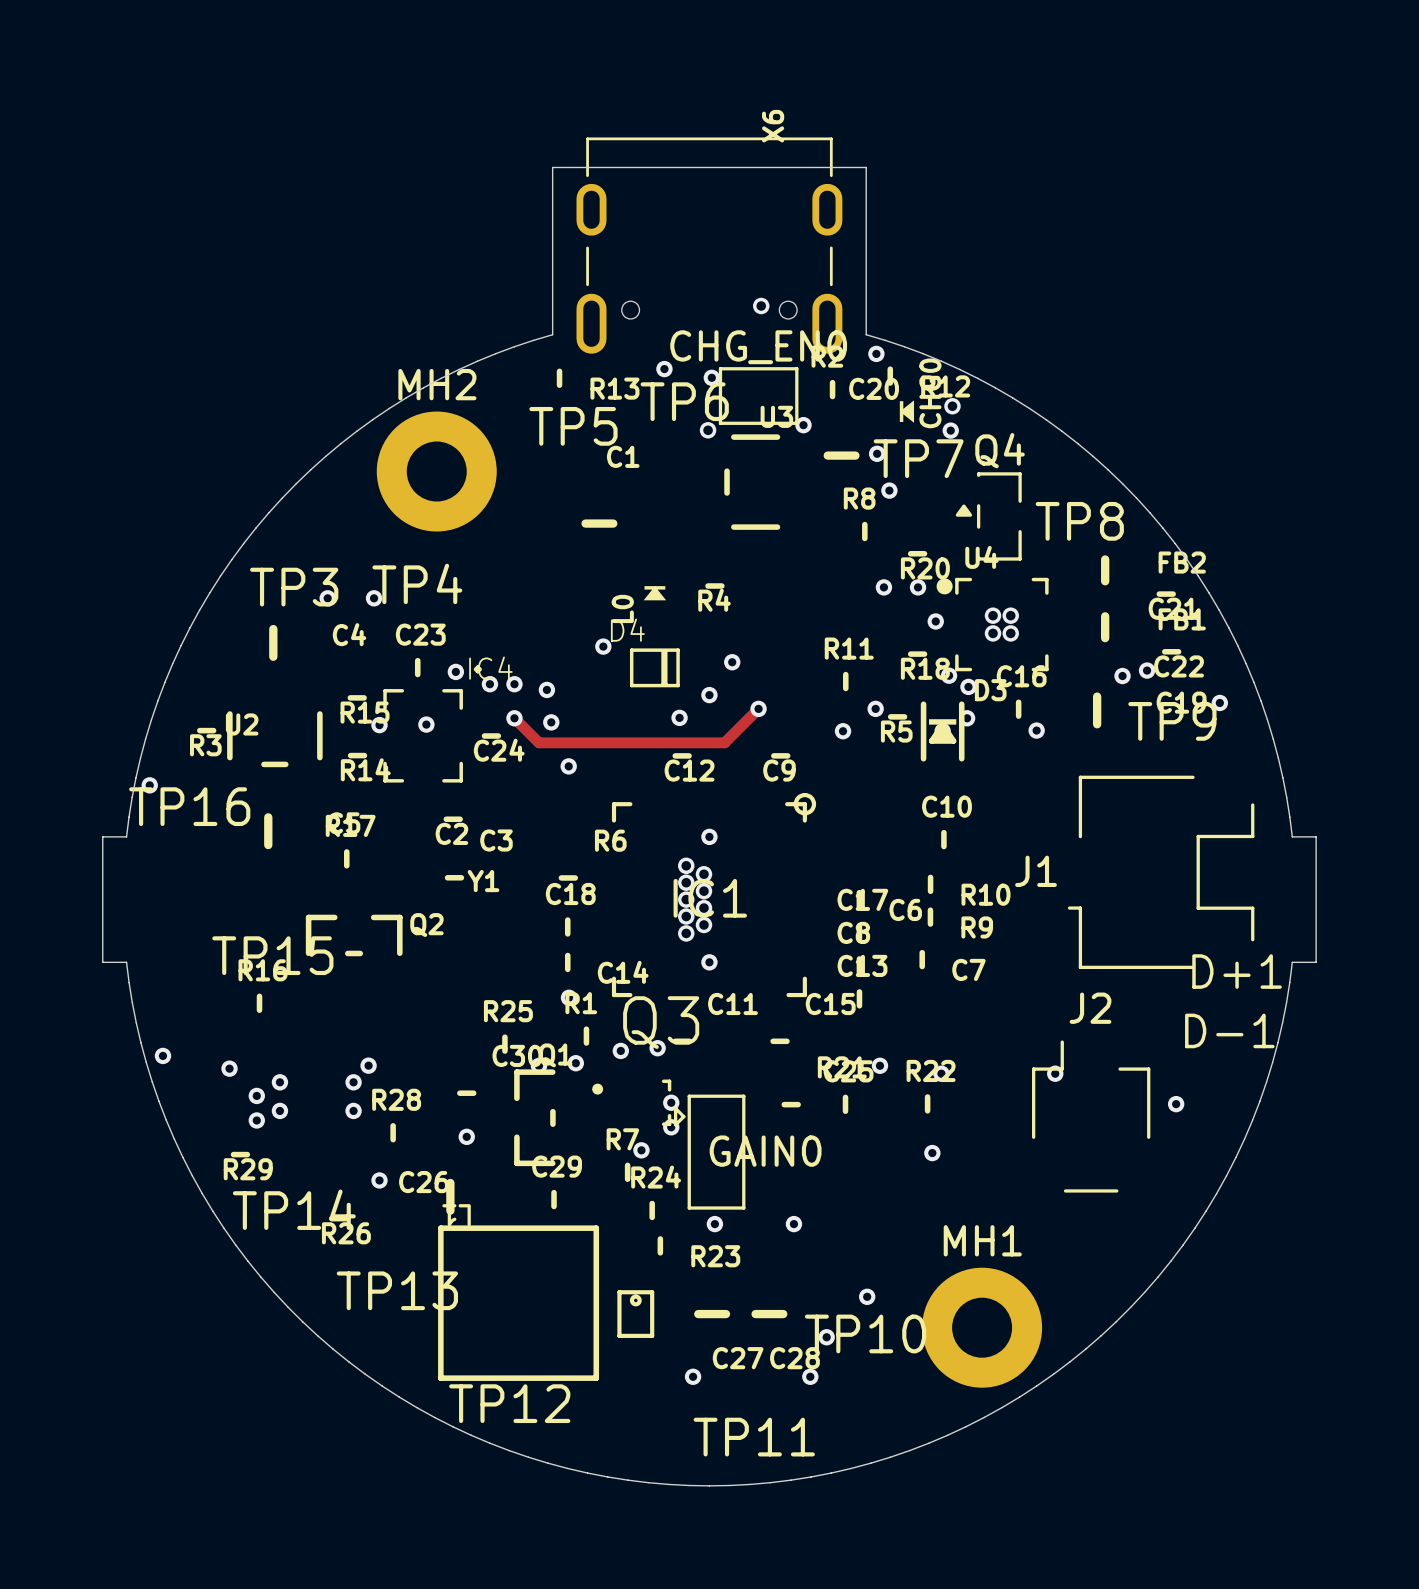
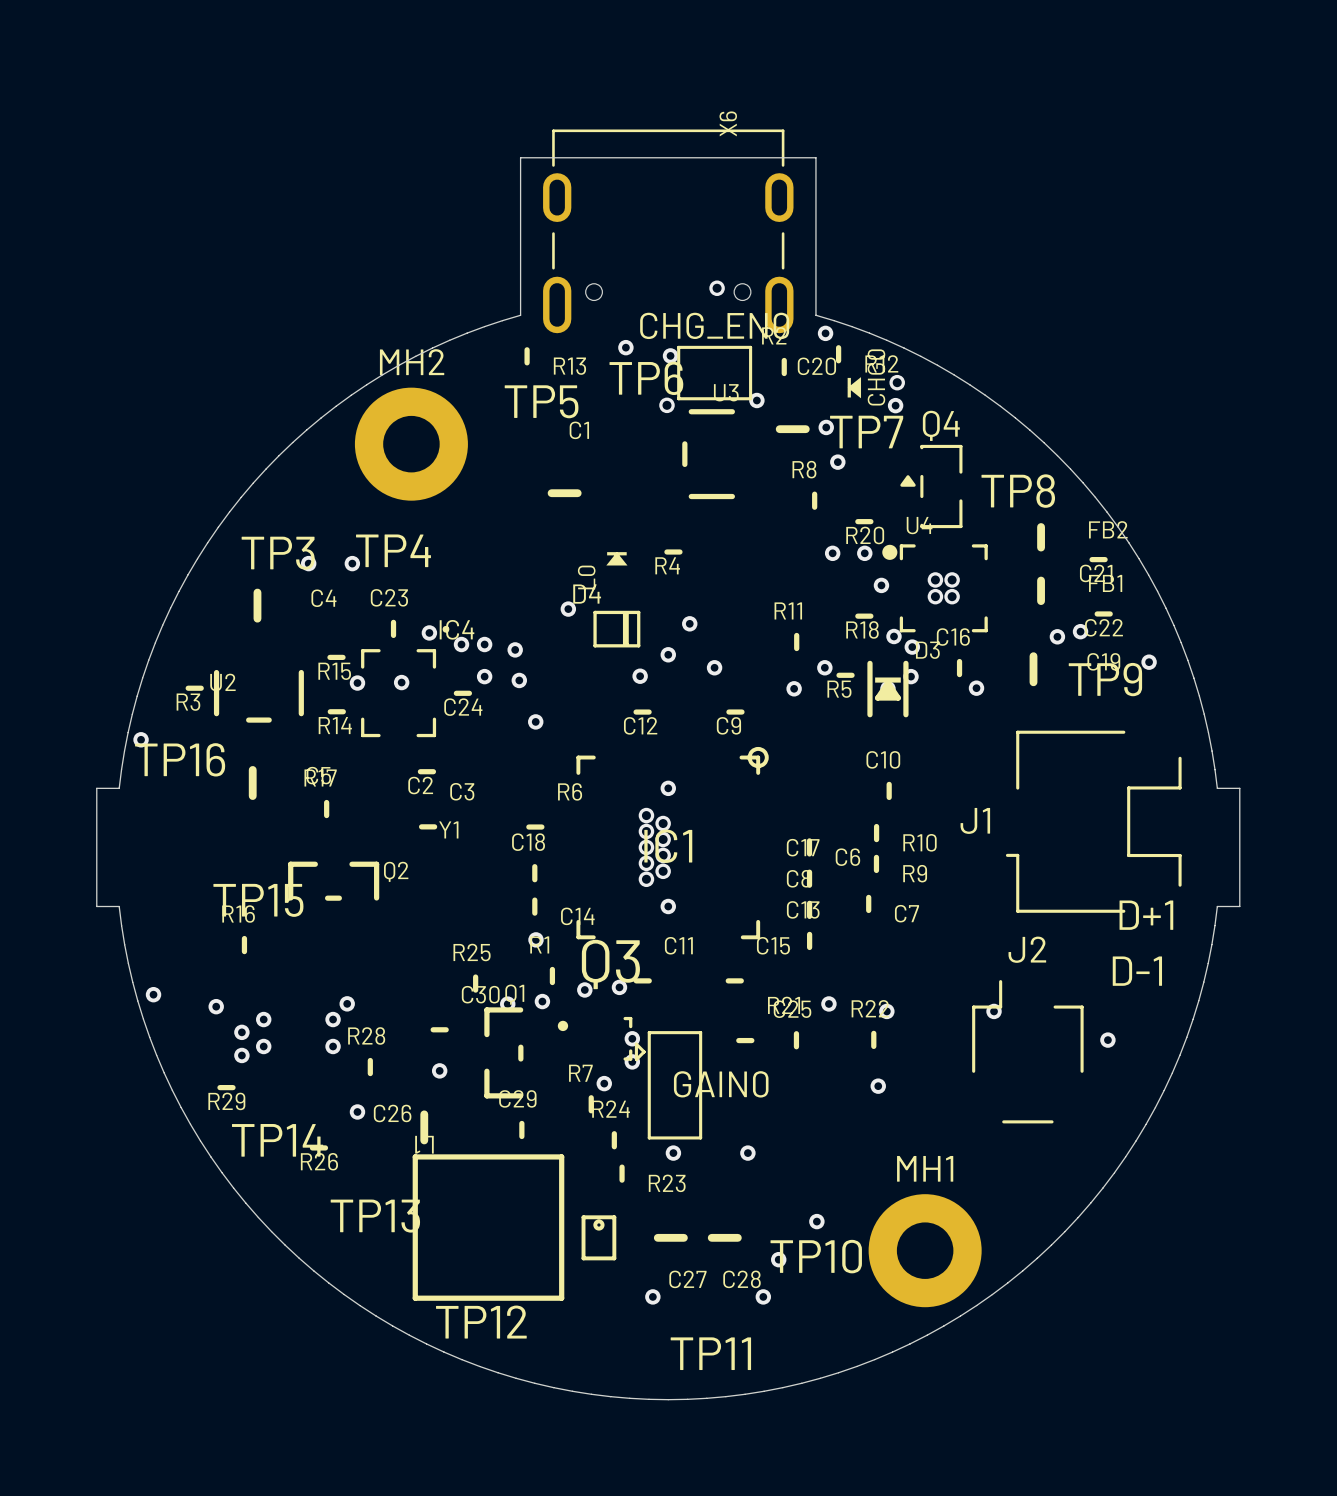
track: (758, 708) (724, 742) (539, 742) (514, 718) -> none

